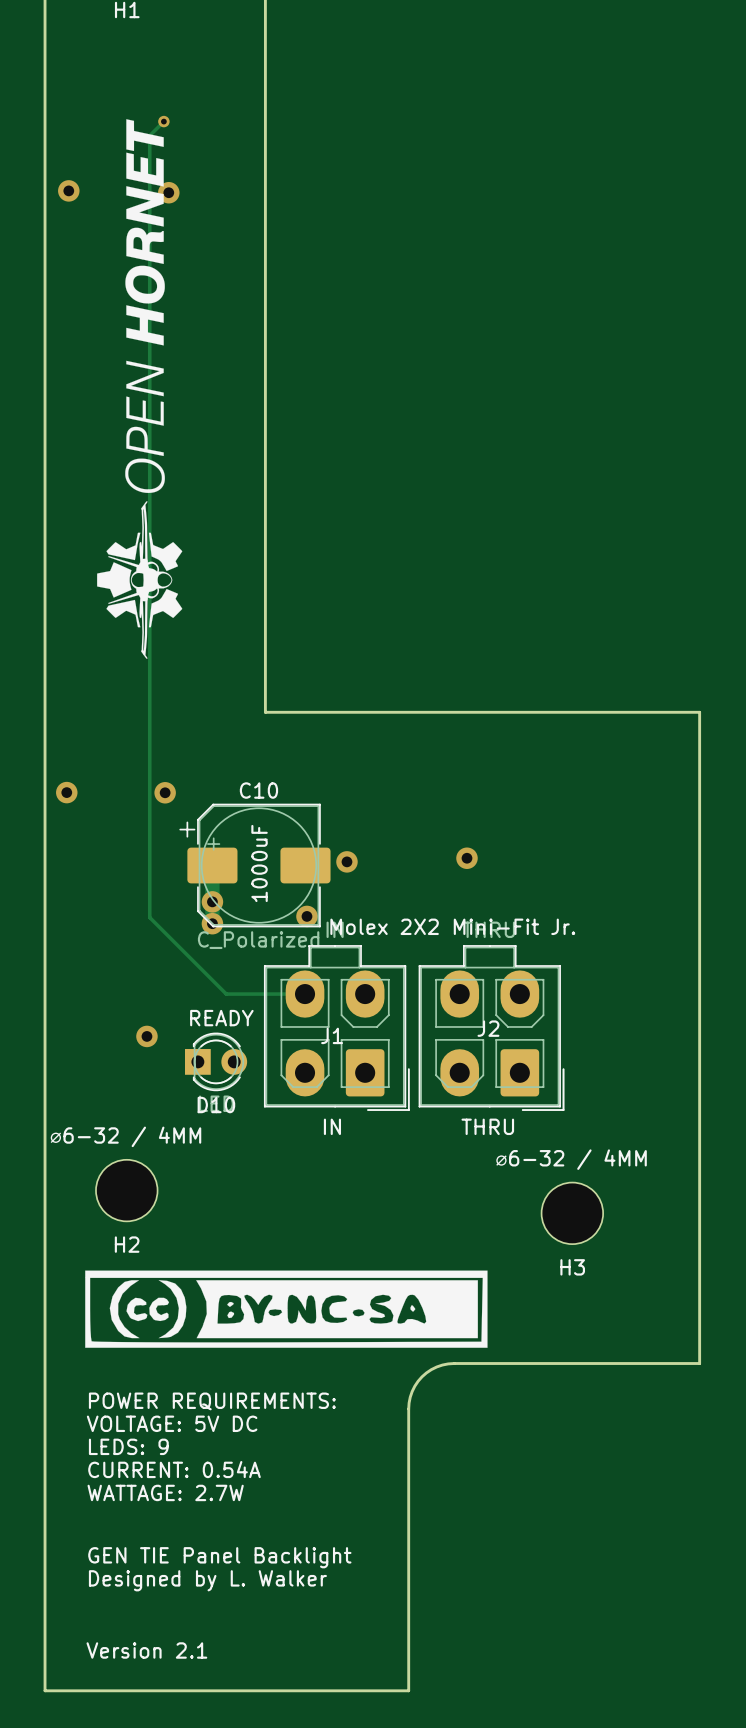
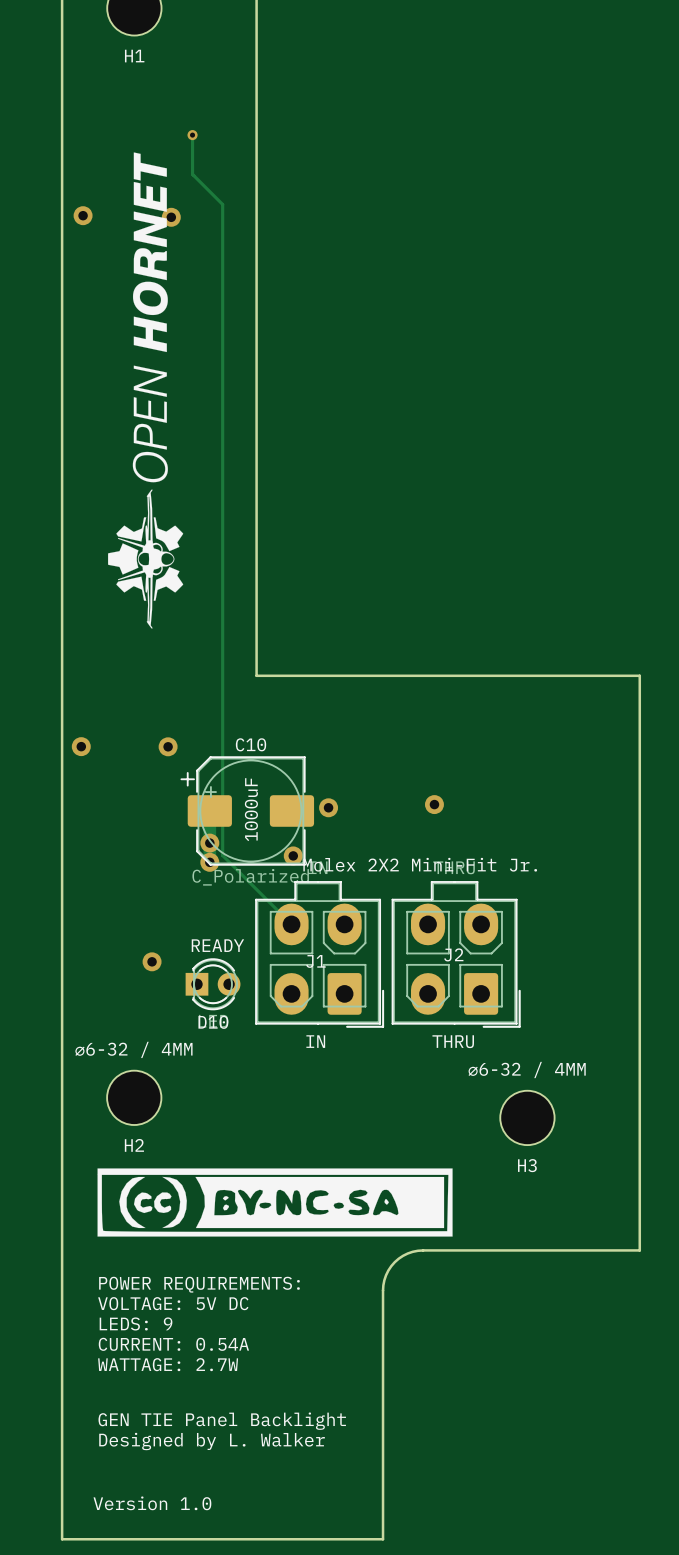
track: (163, 121) (149, 135) (149, 917) (226, 994) (305, 994) -> (192, 135) (192, 174) (222, 204) (222, 855) (291, 924)
via position: (163, 121) -> (192, 135)
text: Version 2.1 (146, 1650) -> Version 1.0 (152, 1503)

